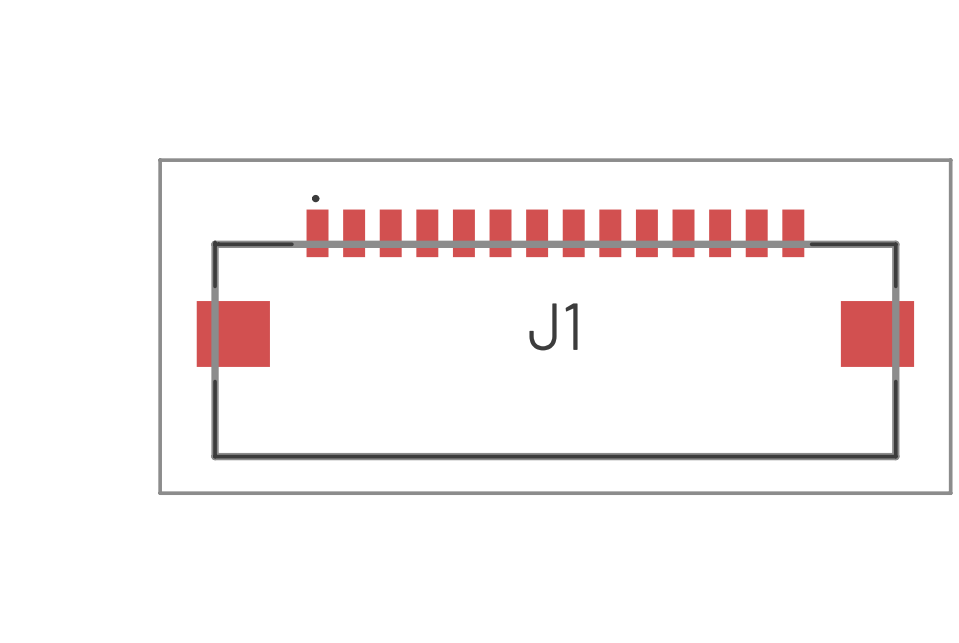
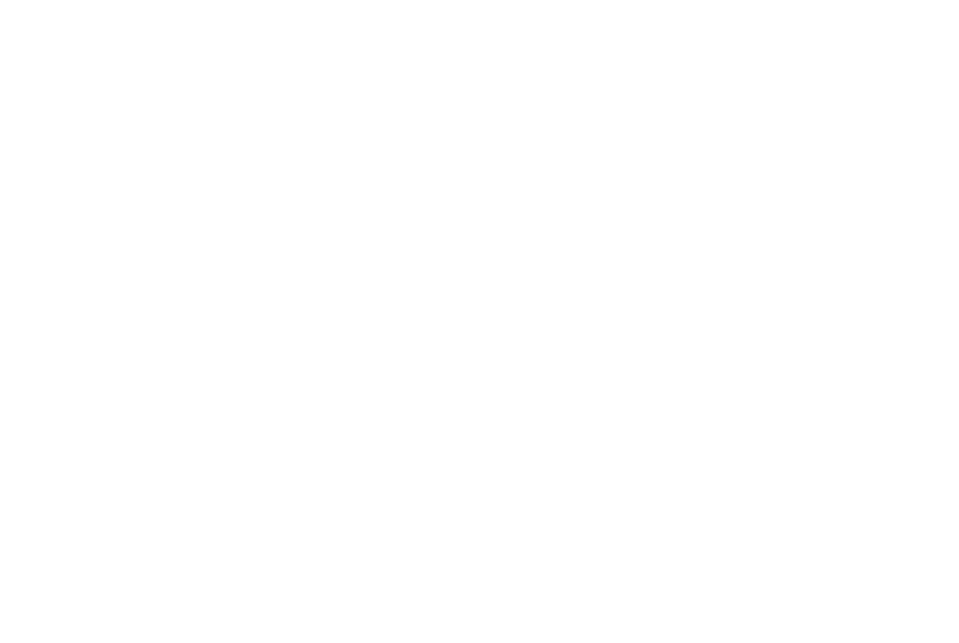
J1: (555, 326) -> none

